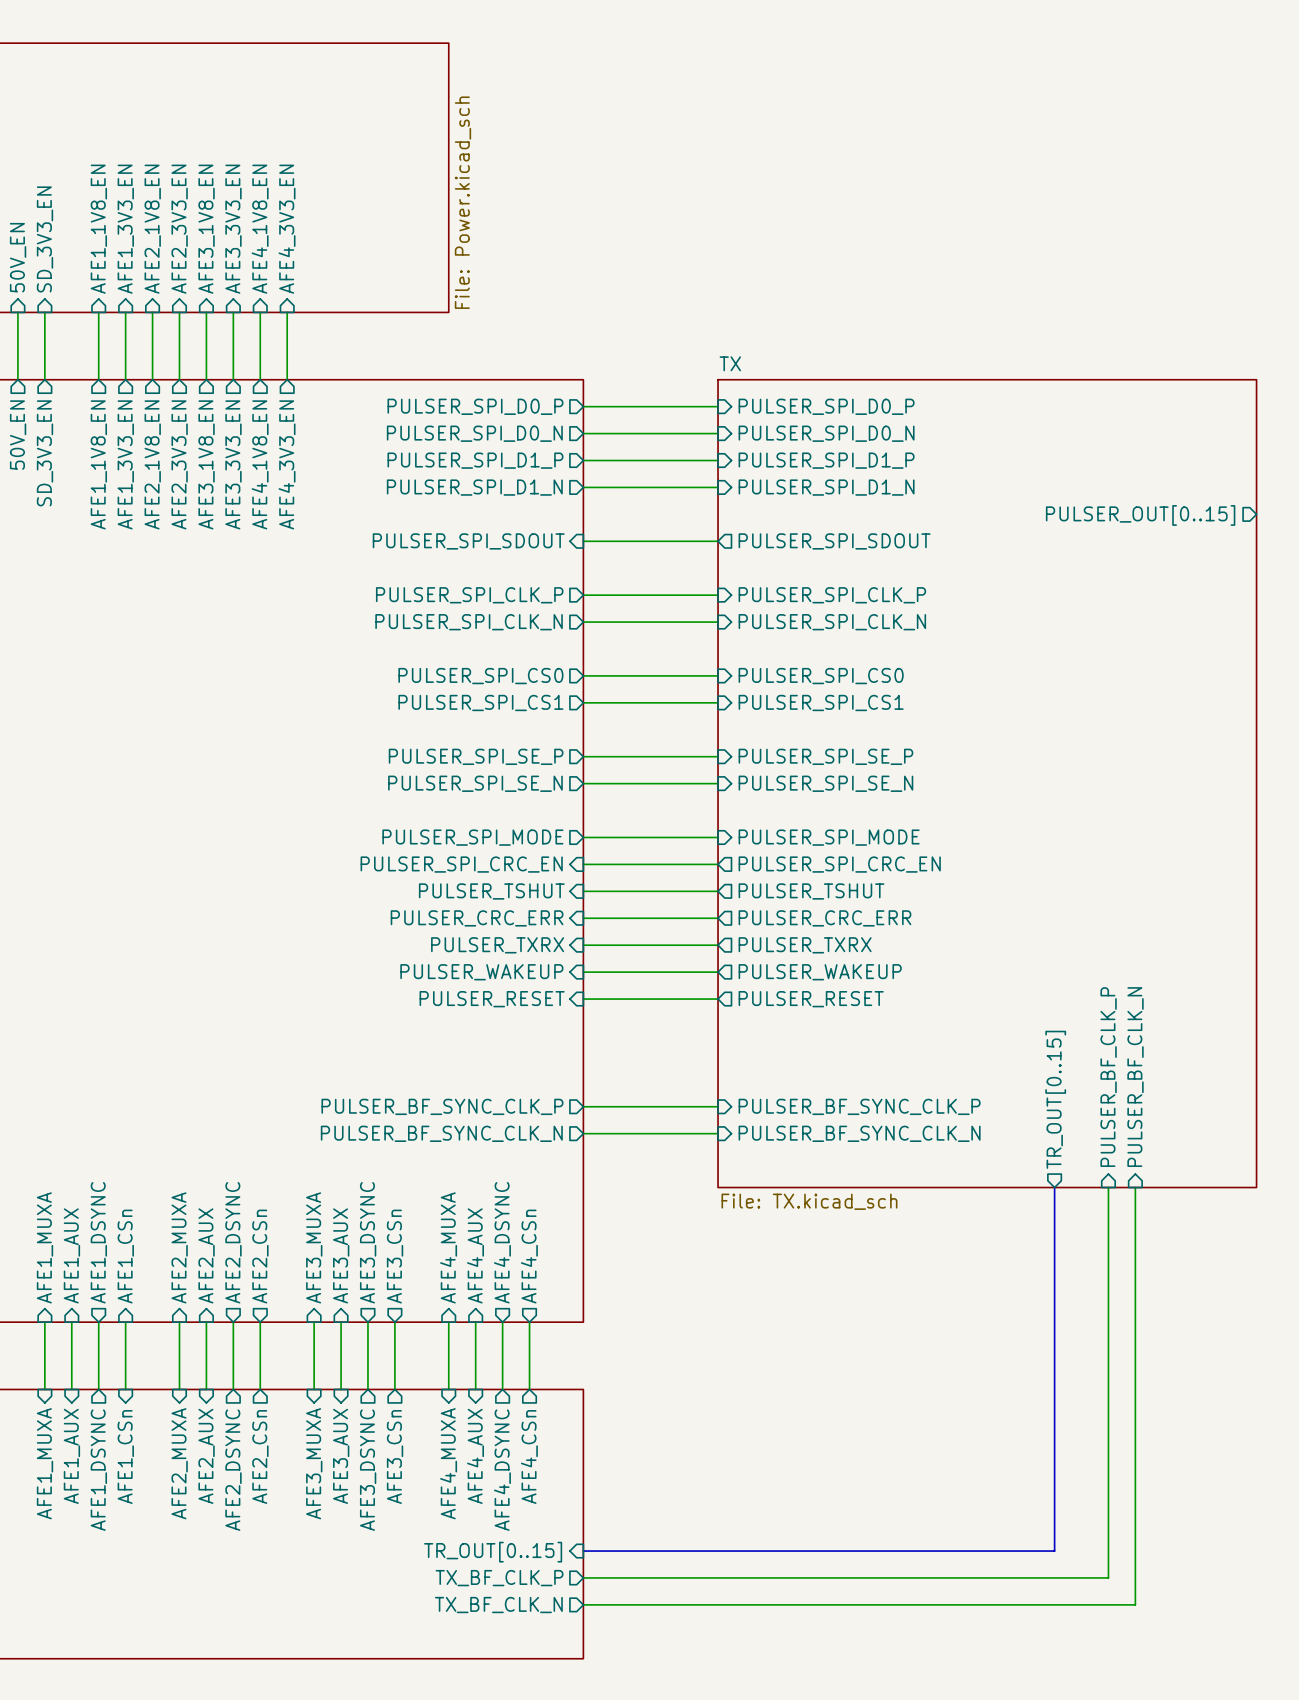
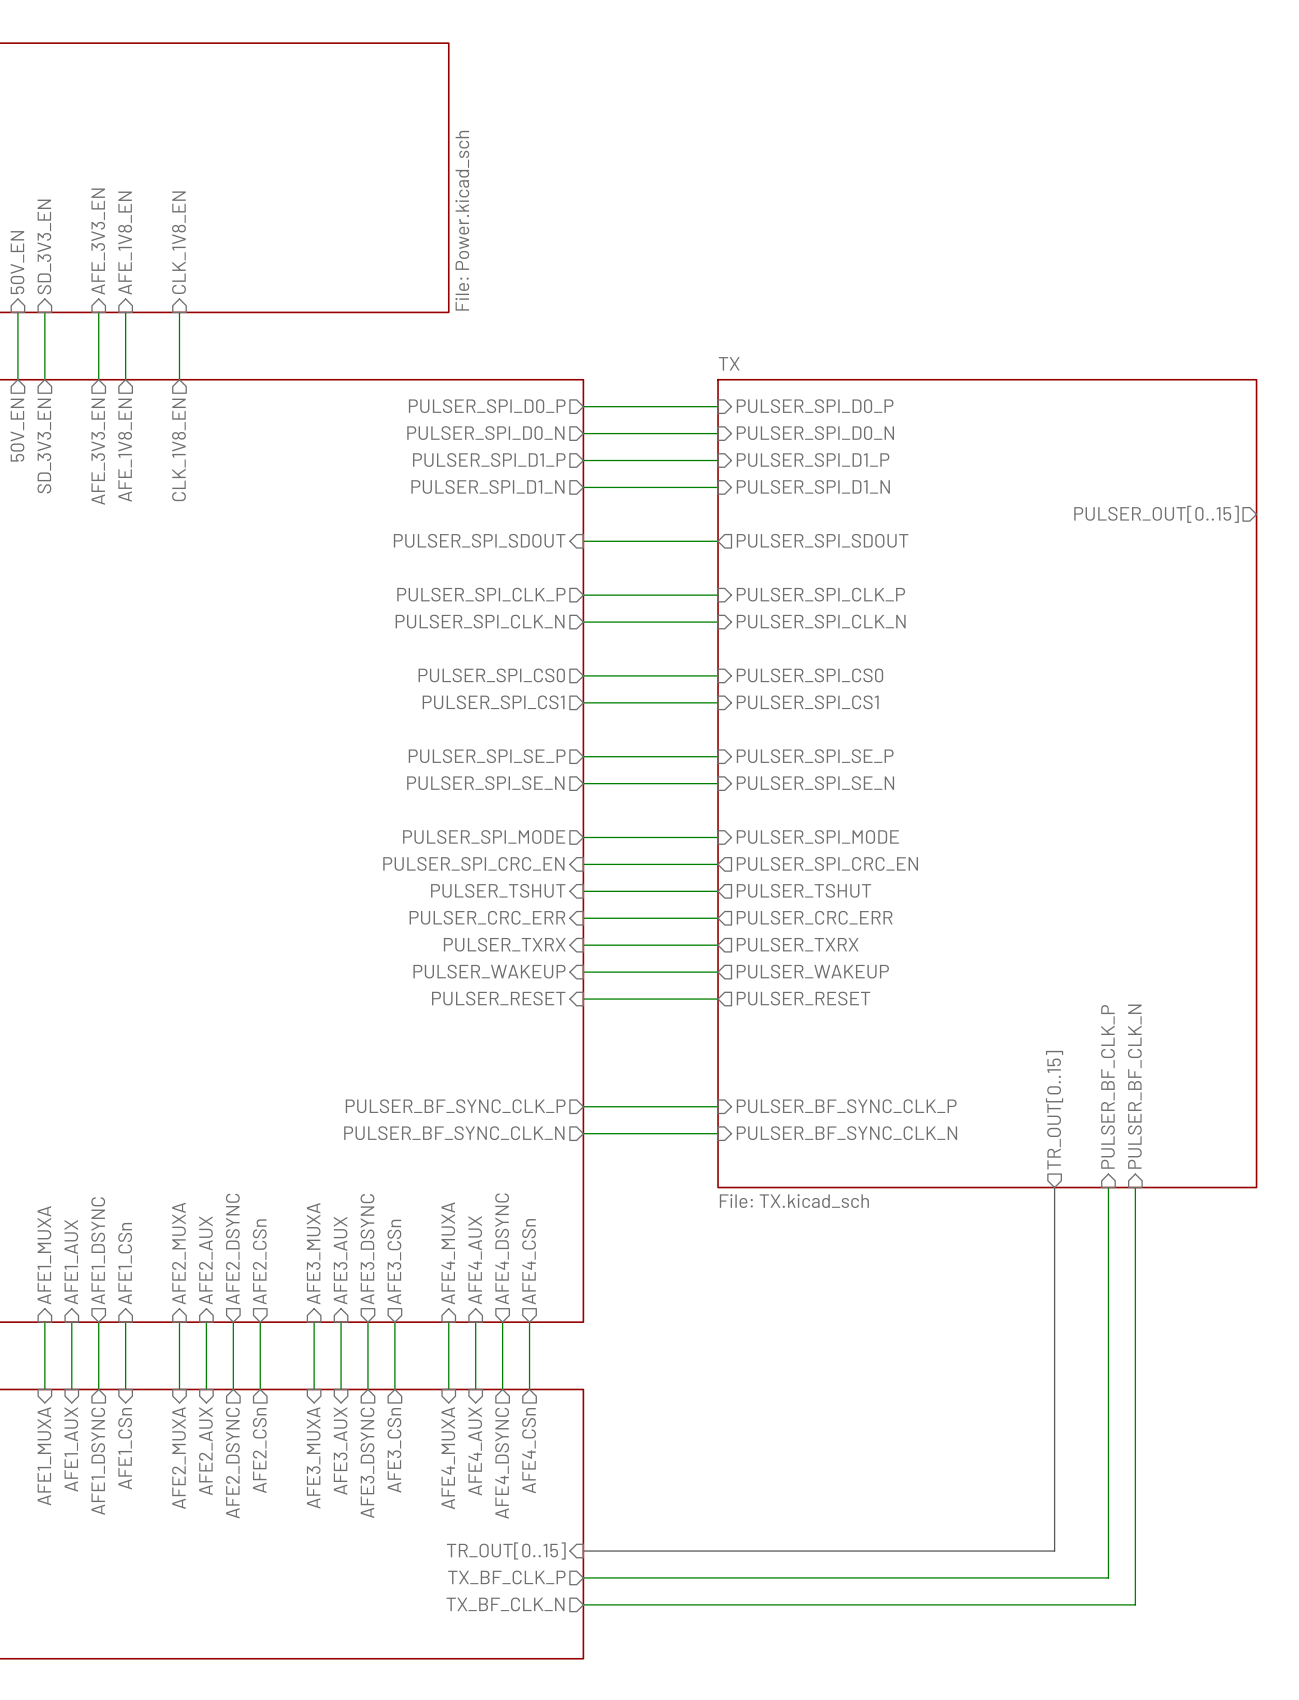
sheet pin: AFE1_1V8_EN (98, 229) -> AFE_3V3_EN (98, 241)
sheet pin: AFE1_3V3_EN (125, 229) -> AFE_1V8_EN (125, 243)
sheet pin: AFE2_1V8_EN (152, 229) -> none
sheet pin: AFE2_3V3_EN (179, 229) -> CLK_1V8_EN (178, 242)
sheet pin: AFE3_1V8_EN (206, 229) -> none
sheet pin: AFE3_3V3_EN (233, 229) -> none
sheet pin: AFE4_1V8_EN (260, 229) -> none
sheet pin: AFE4_3V3_EN (287, 229) -> none
wire: (152, 312) (152, 379) -> none
wire: (206, 312) (206, 379) -> none
wire: (233, 312) (233, 379) -> none
wire: (260, 312) (260, 379) -> none
wire: (287, 312) (287, 379) -> none
sheet pin: AFE1_1V8_EN (98, 464) -> AFE_3V3_EN (98, 451)
sheet pin: AFE1_3V3_EN (125, 464) -> AFE_1V8_EN (125, 450)
sheet pin: AFE2_1V8_EN (152, 464) -> none
sheet pin: AFE2_3V3_EN (179, 464) -> CLK_1V8_EN (178, 449)
sheet pin: AFE3_1V8_EN (206, 464) -> none
sheet pin: AFE3_3V3_EN (233, 464) -> none
sheet pin: AFE4_1V8_EN (260, 464) -> none
sheet pin: AFE4_3V3_EN (287, 464) -> none

